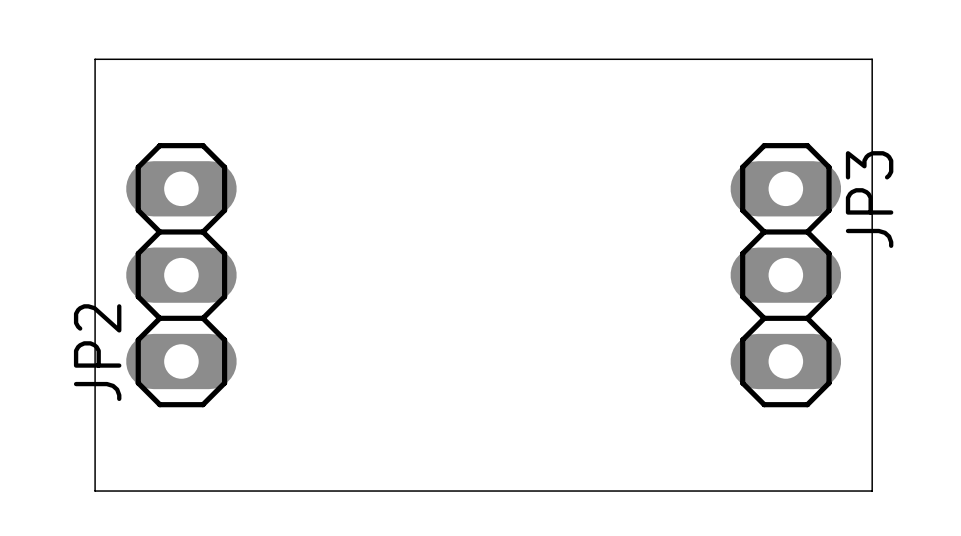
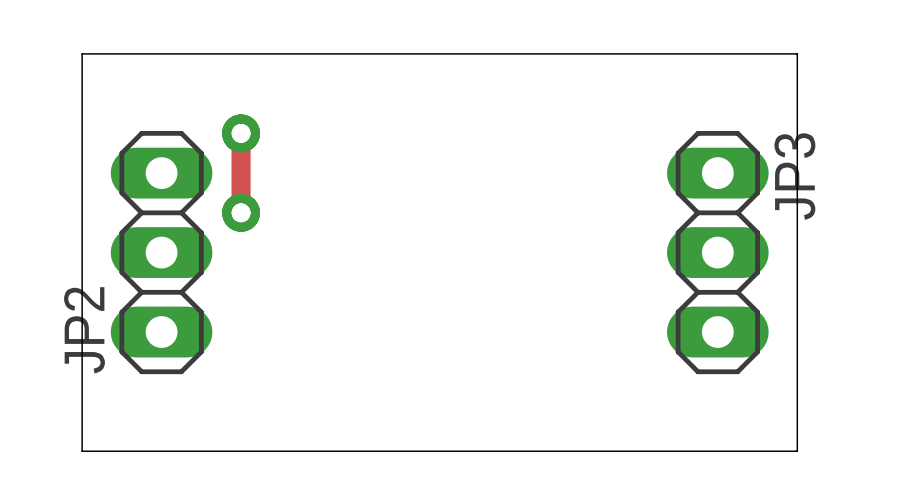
track: none -> (241, 133) (241, 212)
via: none -> (241, 133)
via: none -> (241, 212)

